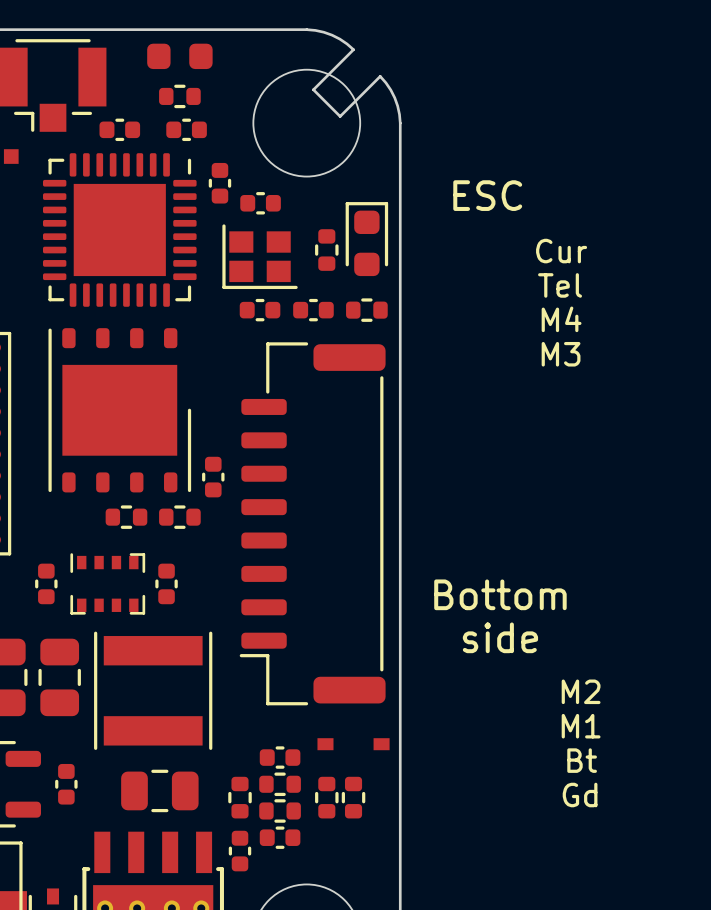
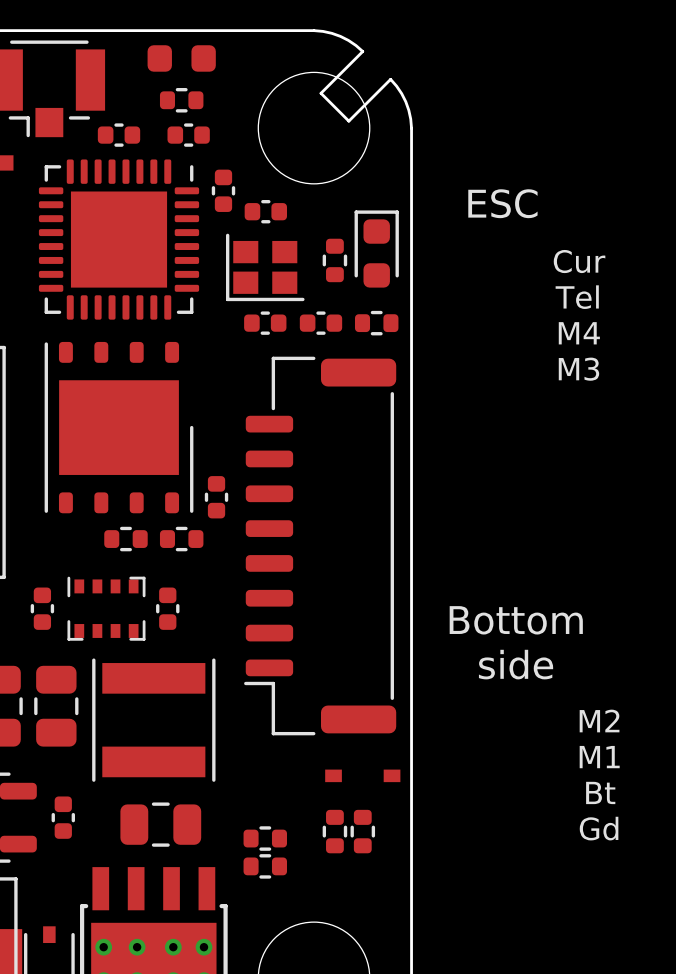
part: (280, 757) -> none
part: (280, 784) -> none
part: (240, 797) -> none
part: none -> (265, 838)
part: (280, 810) -> none
part: none -> (265, 866)
part: (280, 837) -> none
part: (240, 851) -> none

